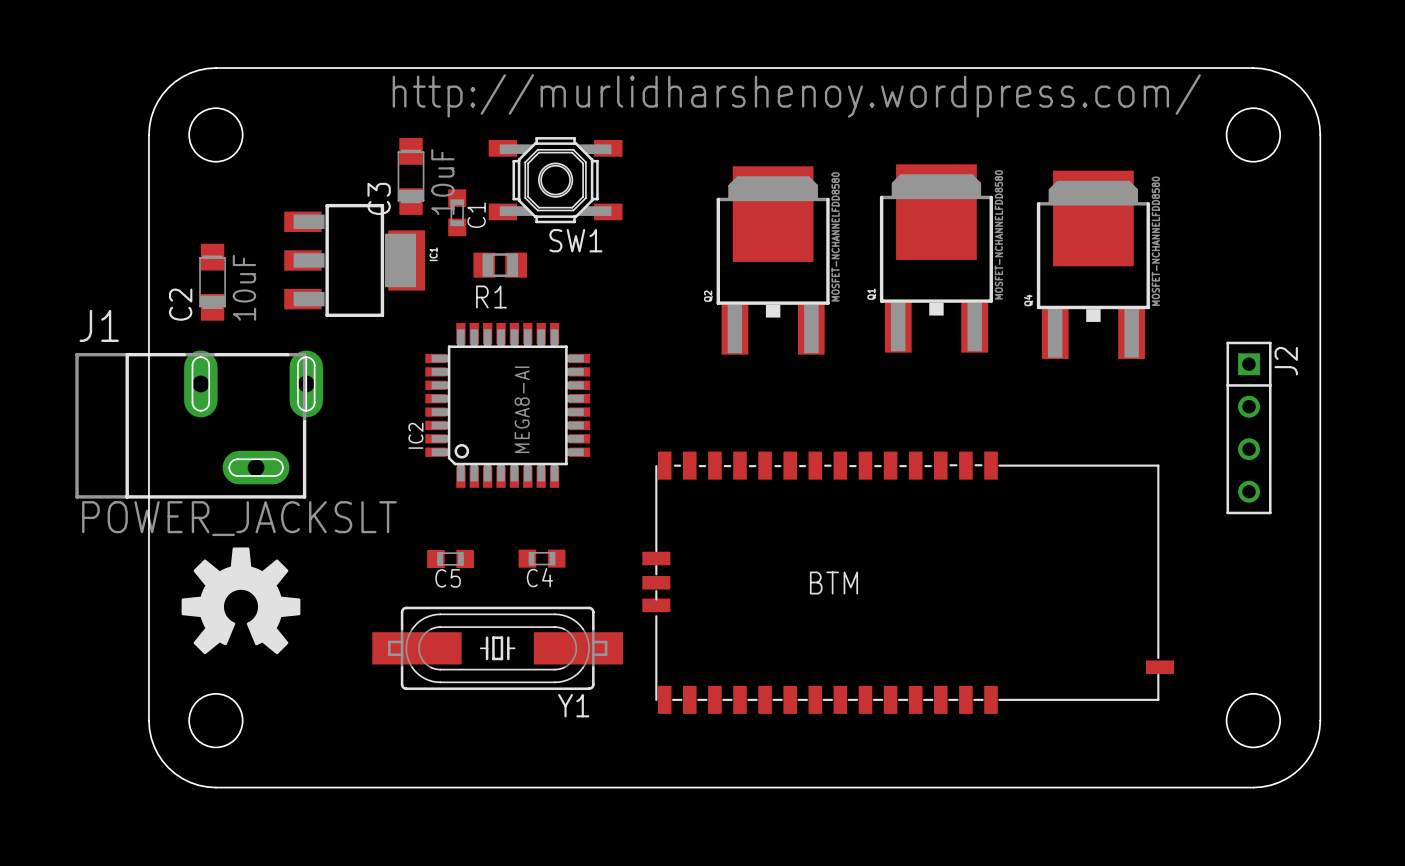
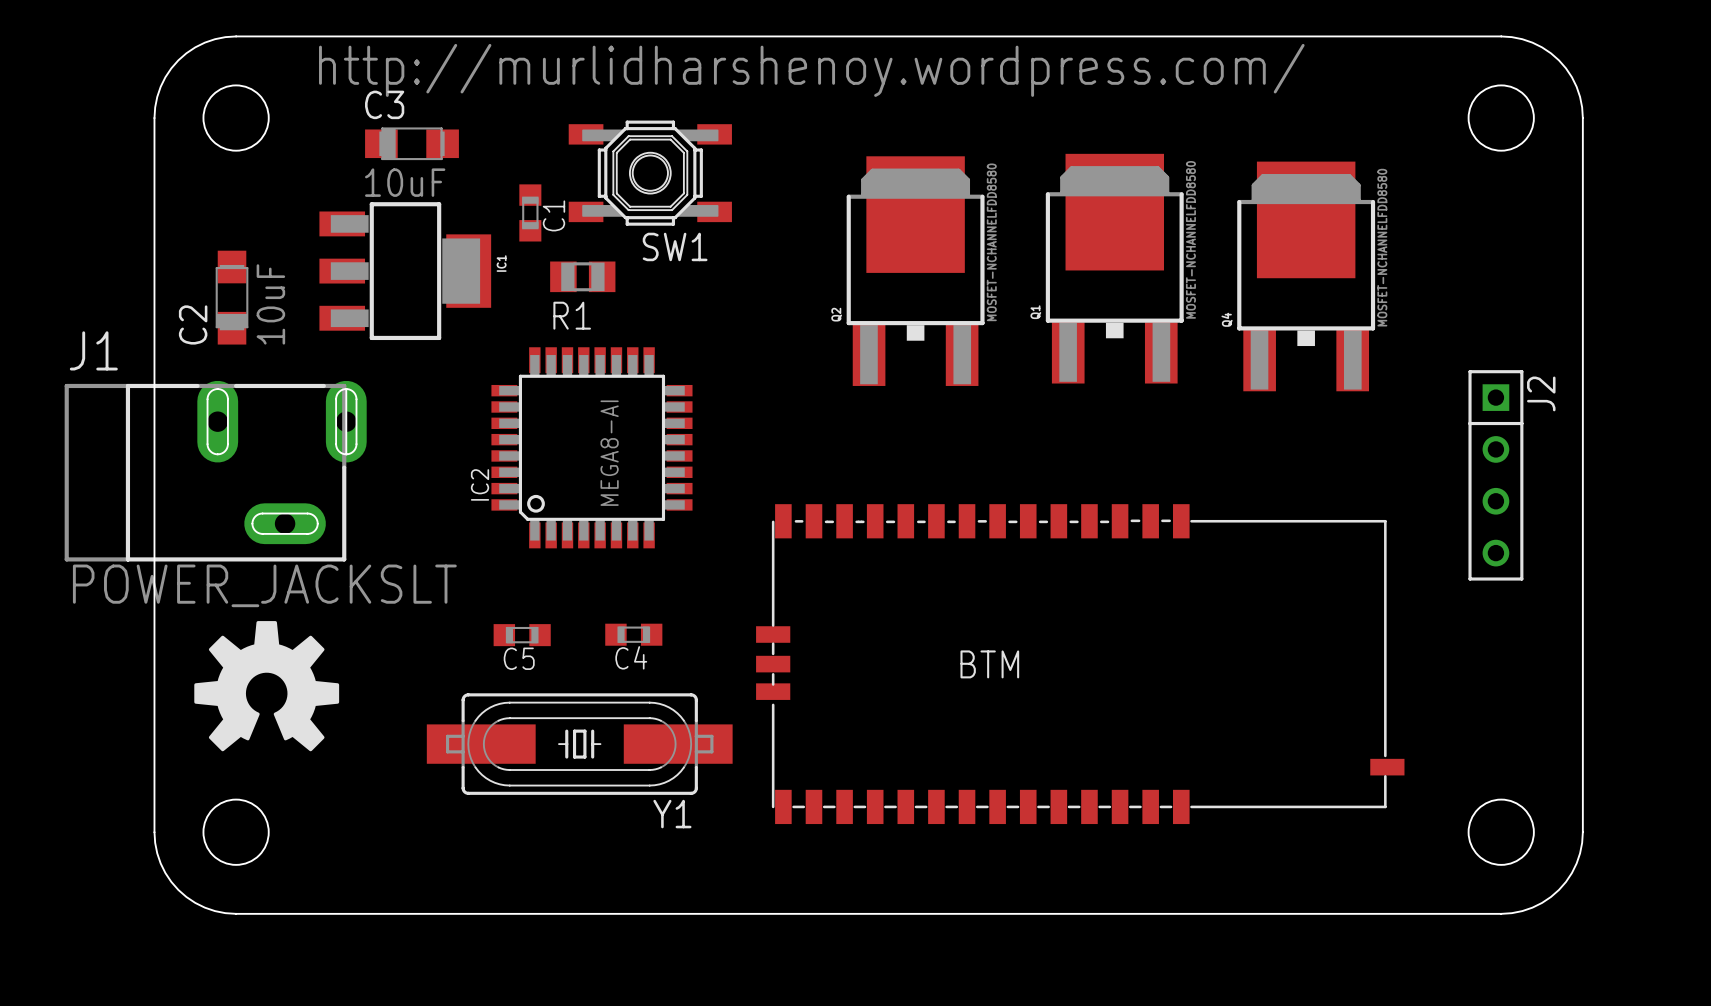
text position: http://murlidharshenoy.wordpress.com/ (796, 95) -> http://murlidharshenoy.wordpress.com/ (811, 70)
C3 rotation: 0° (411, 176) -> 90° clockwise (411, 143)
C3 position: (411, 176) -> (411, 143)

